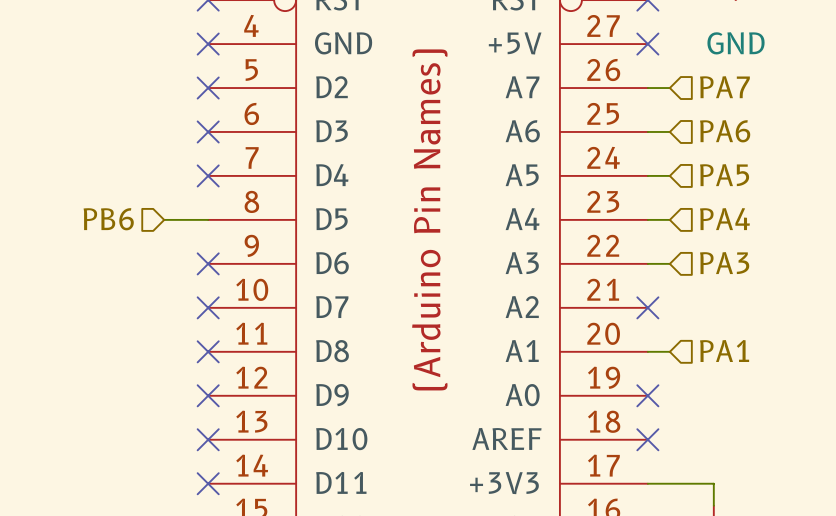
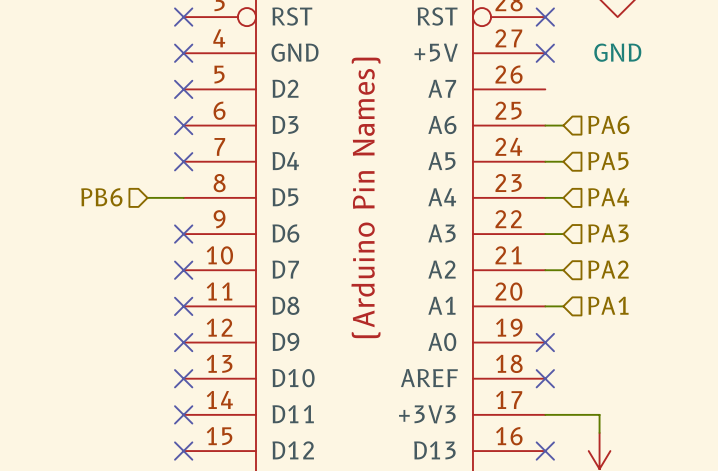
hierarchical label: PA7 (724, 87) -> none
wire: (647, 88) (669, 88) -> (545, 270) (563, 270)
no-connect mark: (647, 307) -> none
hierarchical label: none -> PA2 (608, 269)

